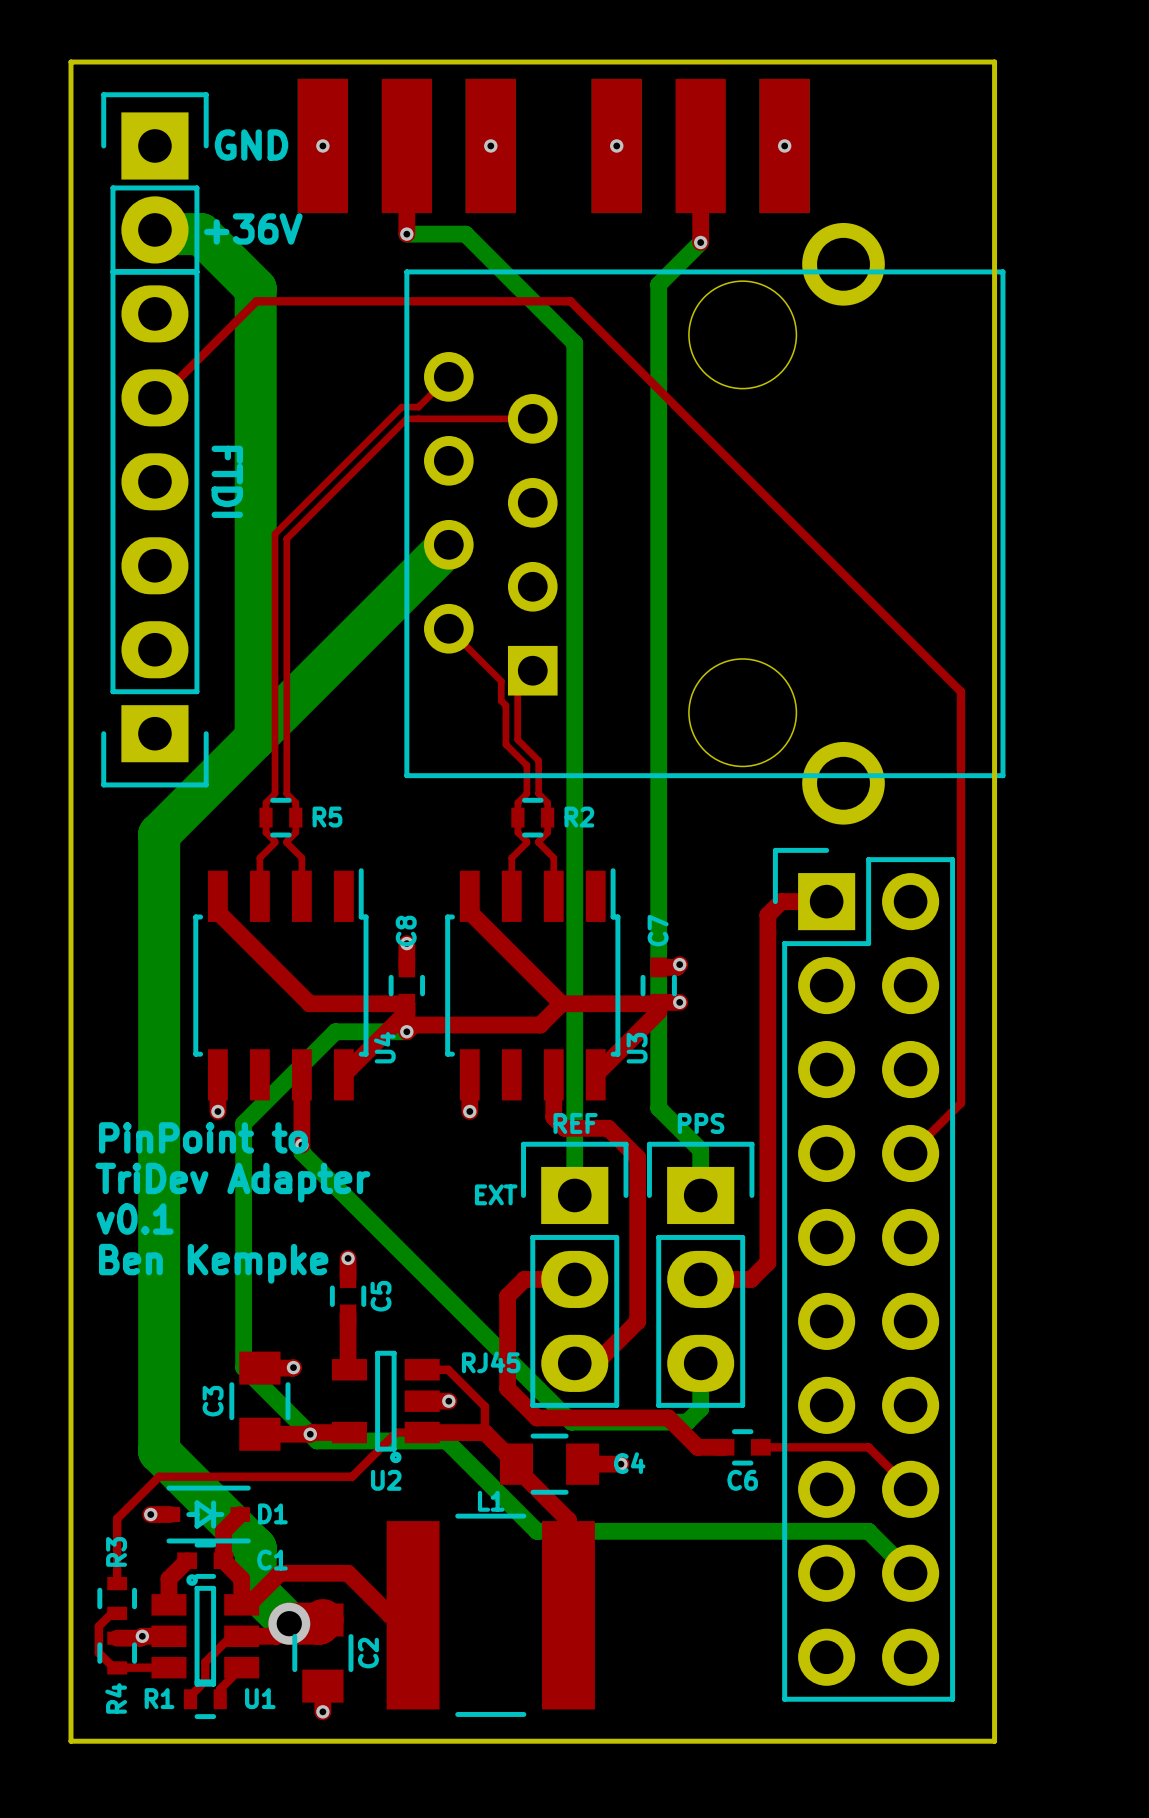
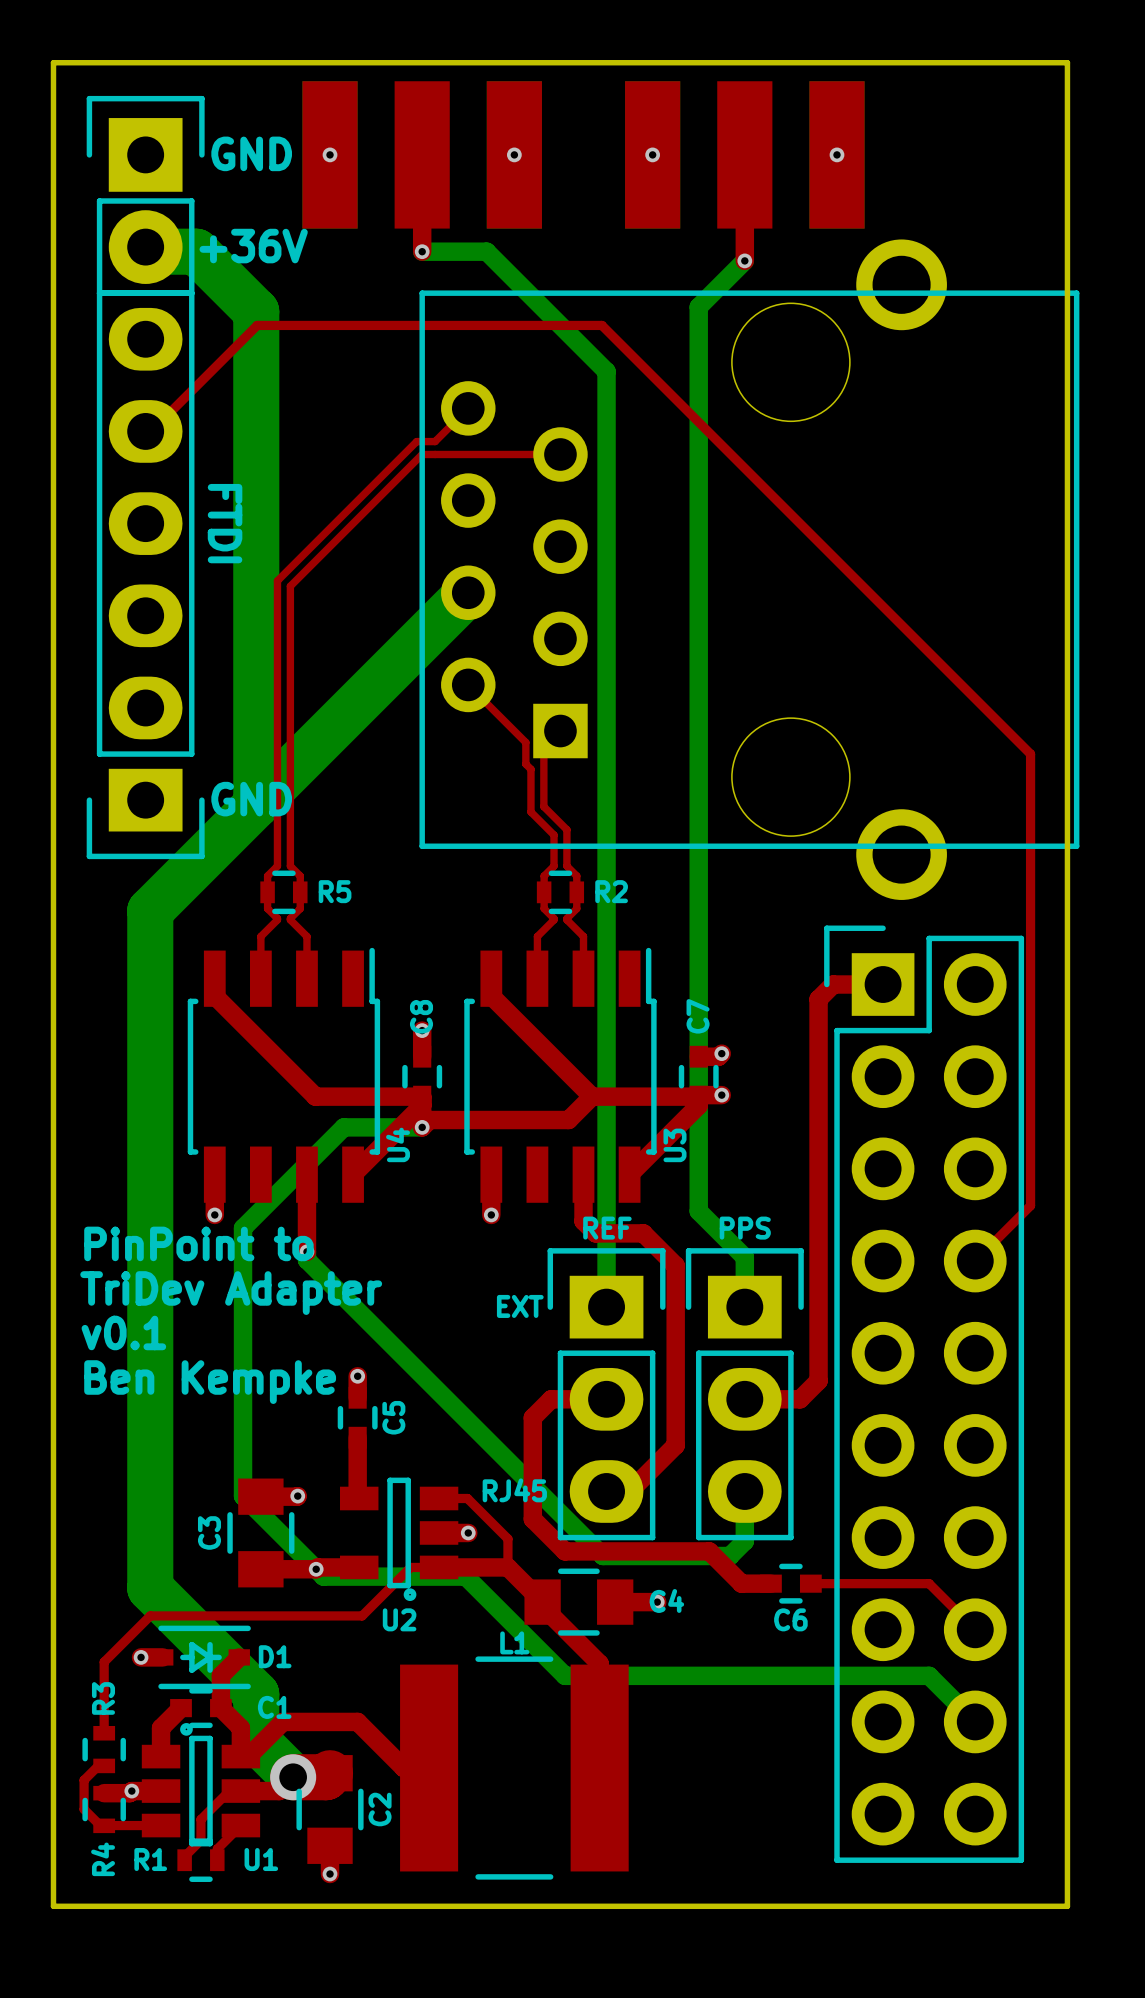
text: none -> GND (251, 799)

